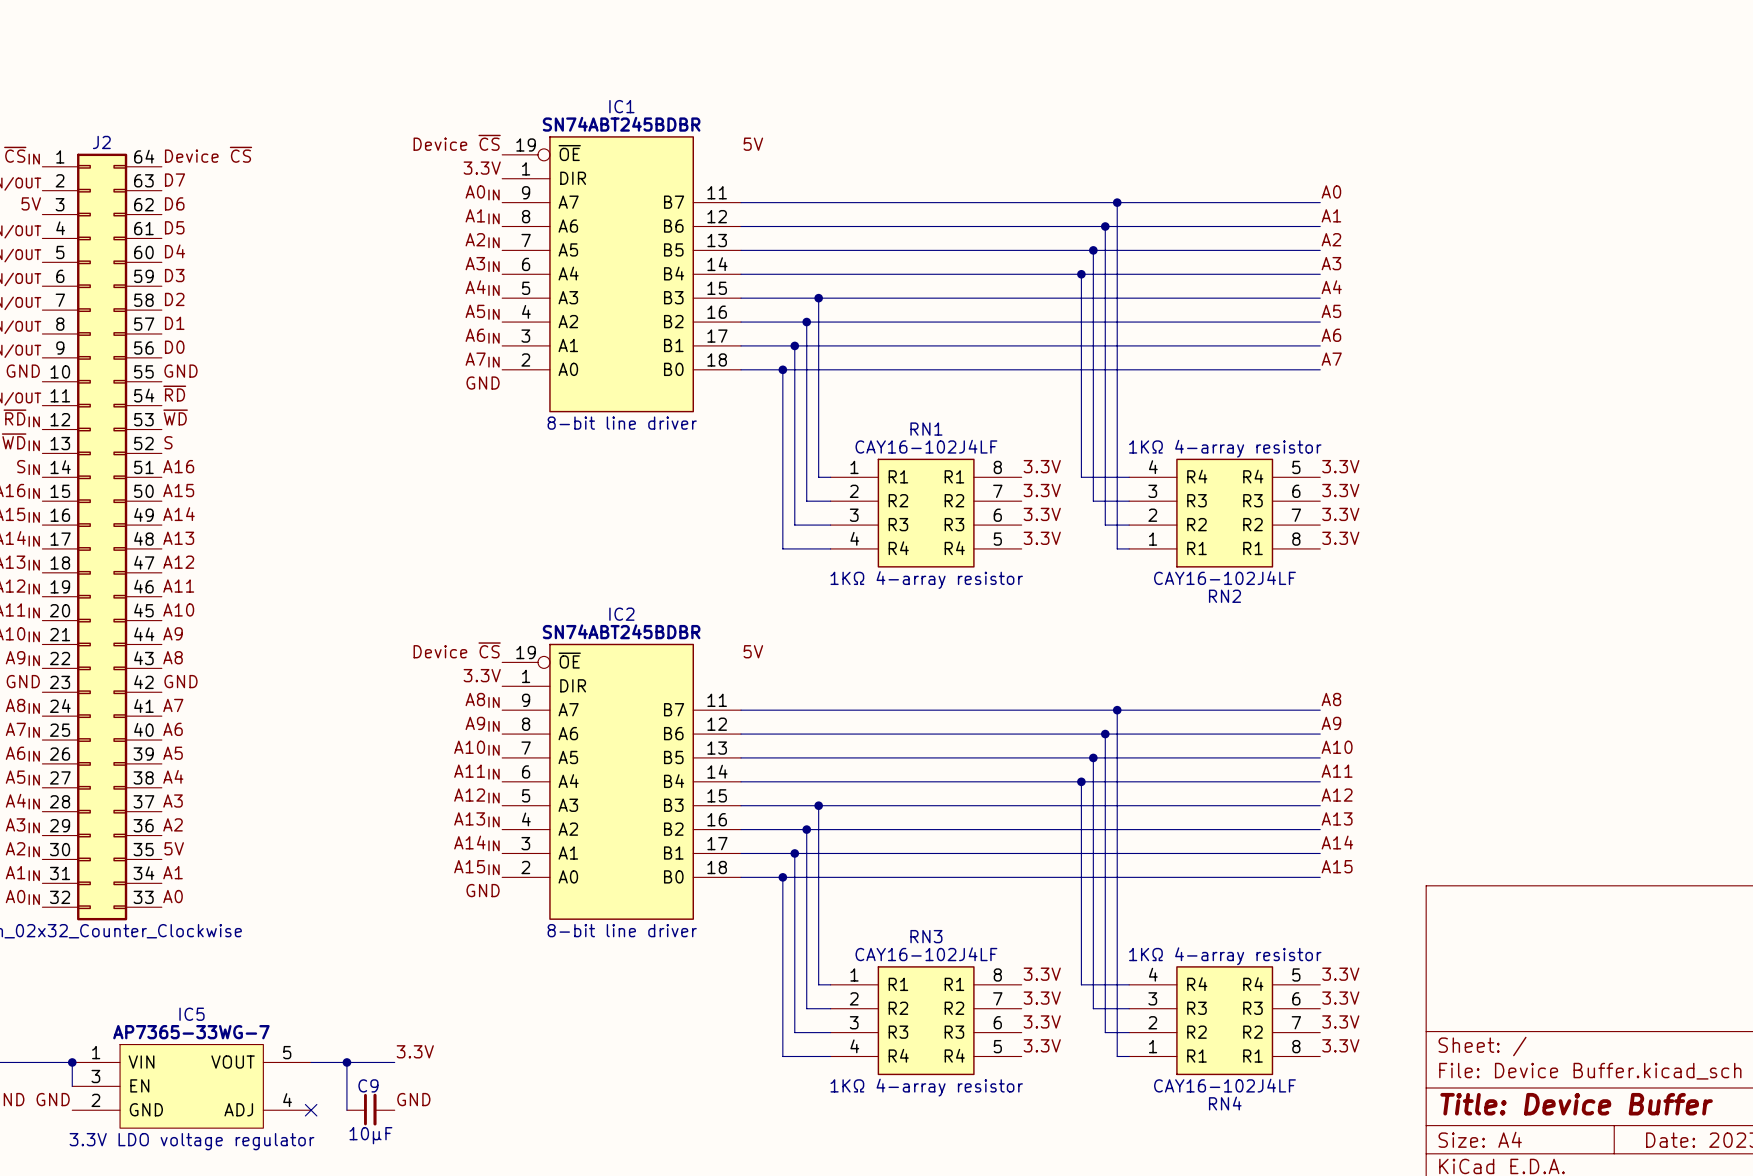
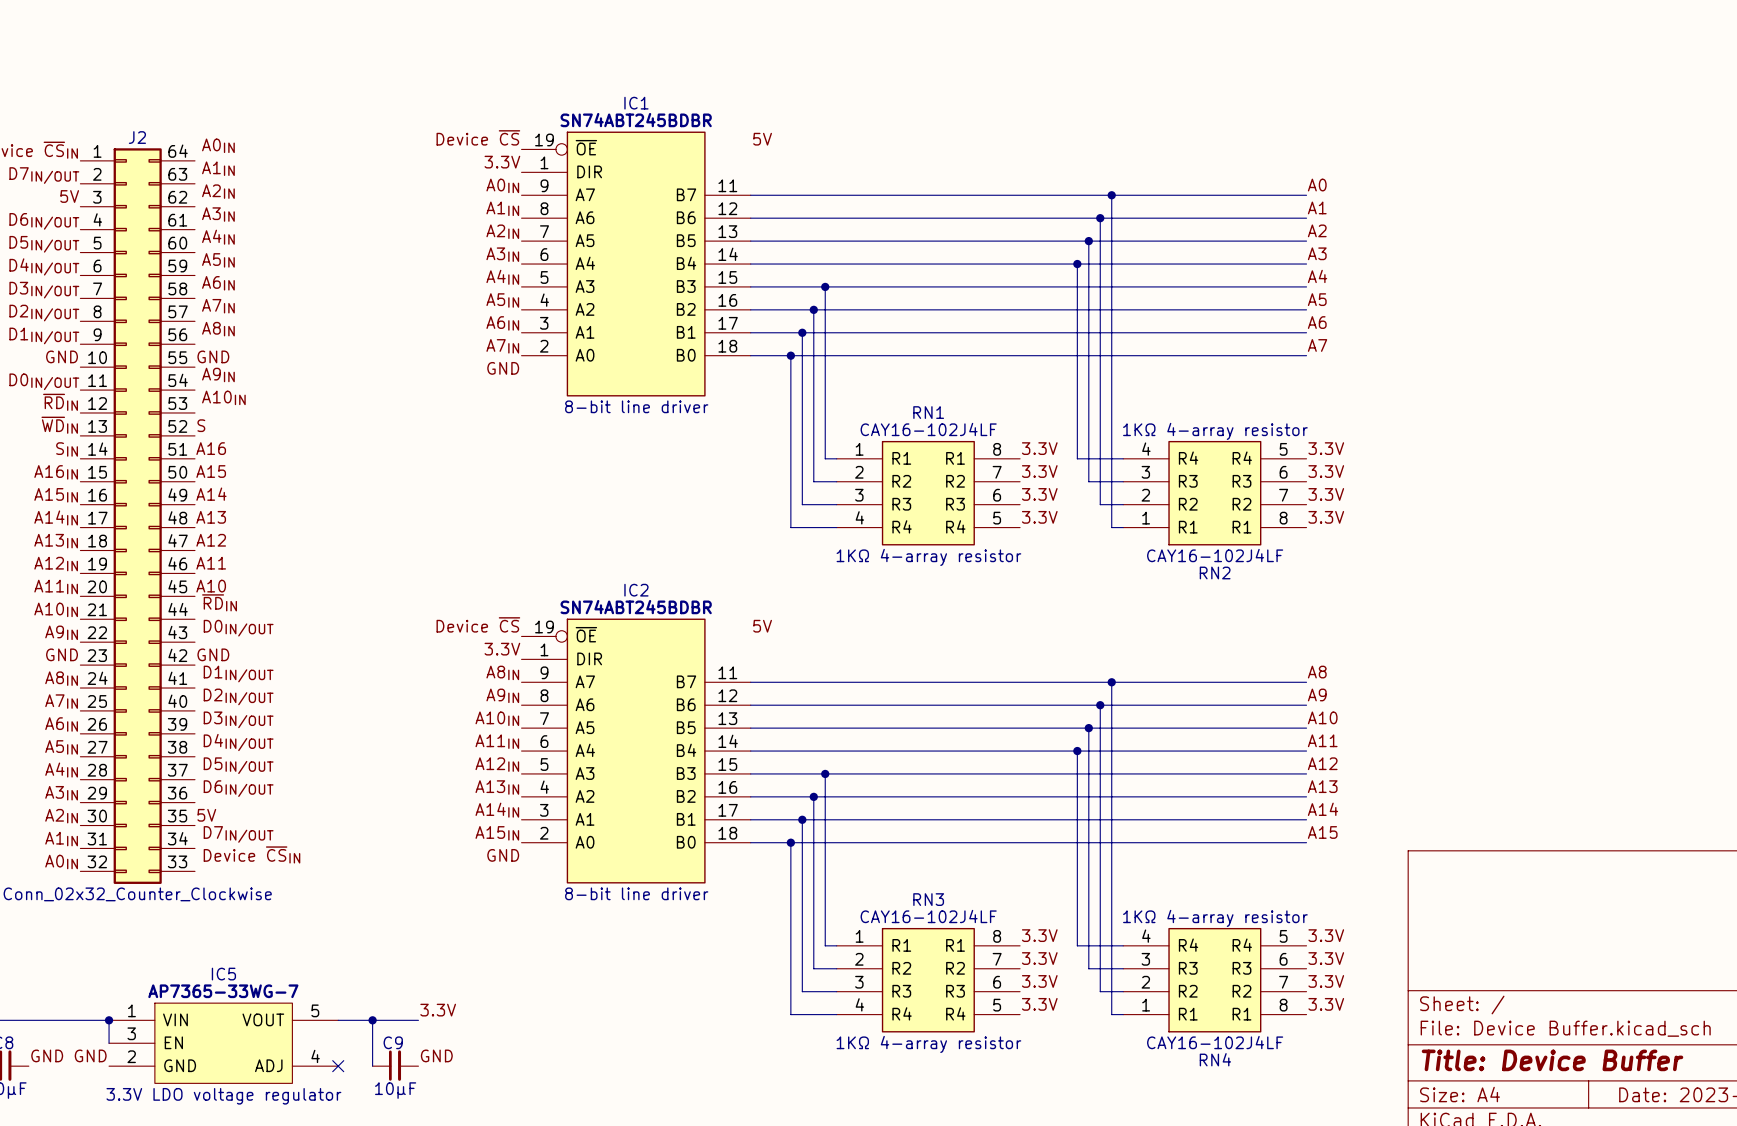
label: Device ~{CS} (208, 154) -> A0IN (218, 145)
label: D7 (175, 180) -> A1IN (218, 168)
label: D6 (174, 203) -> A2IN (218, 191)
label: D5 (174, 227) -> A3IN (218, 214)
label: D4 (175, 251) -> A4IN (218, 237)
label: D3 (174, 275) -> A5IN (218, 260)
label: D2 (174, 299) -> A6IN (218, 283)
label: D1 (174, 323) -> A7IN (218, 306)
label: D0 (174, 347) -> A8IN (218, 329)
label: ~{RD} (174, 393) -> A9IN (218, 374)
label: ~{WD} (175, 417) -> A10IN (223, 397)
label: A9 (173, 633) -> ~{RD}IN (219, 602)
label: A8 (173, 657) -> D0IN/OUT (238, 628)
label: A7 (173, 705) -> D1IN/OUT (238, 674)
label: A6 (173, 729) -> D2IN/OUT (238, 696)
label: A5 (173, 753) -> D3IN/OUT (238, 719)
label: A4 (173, 776) -> D4IN/OUT (238, 742)
label: A3 (173, 801) -> D5IN/OUT (238, 765)
label: A2 (173, 824) -> D6IN/OUT (238, 788)
label: A1 (173, 872) -> D7IN/OUT (238, 834)
label: A0 (173, 896) -> Device ~{CS}IN (251, 854)

